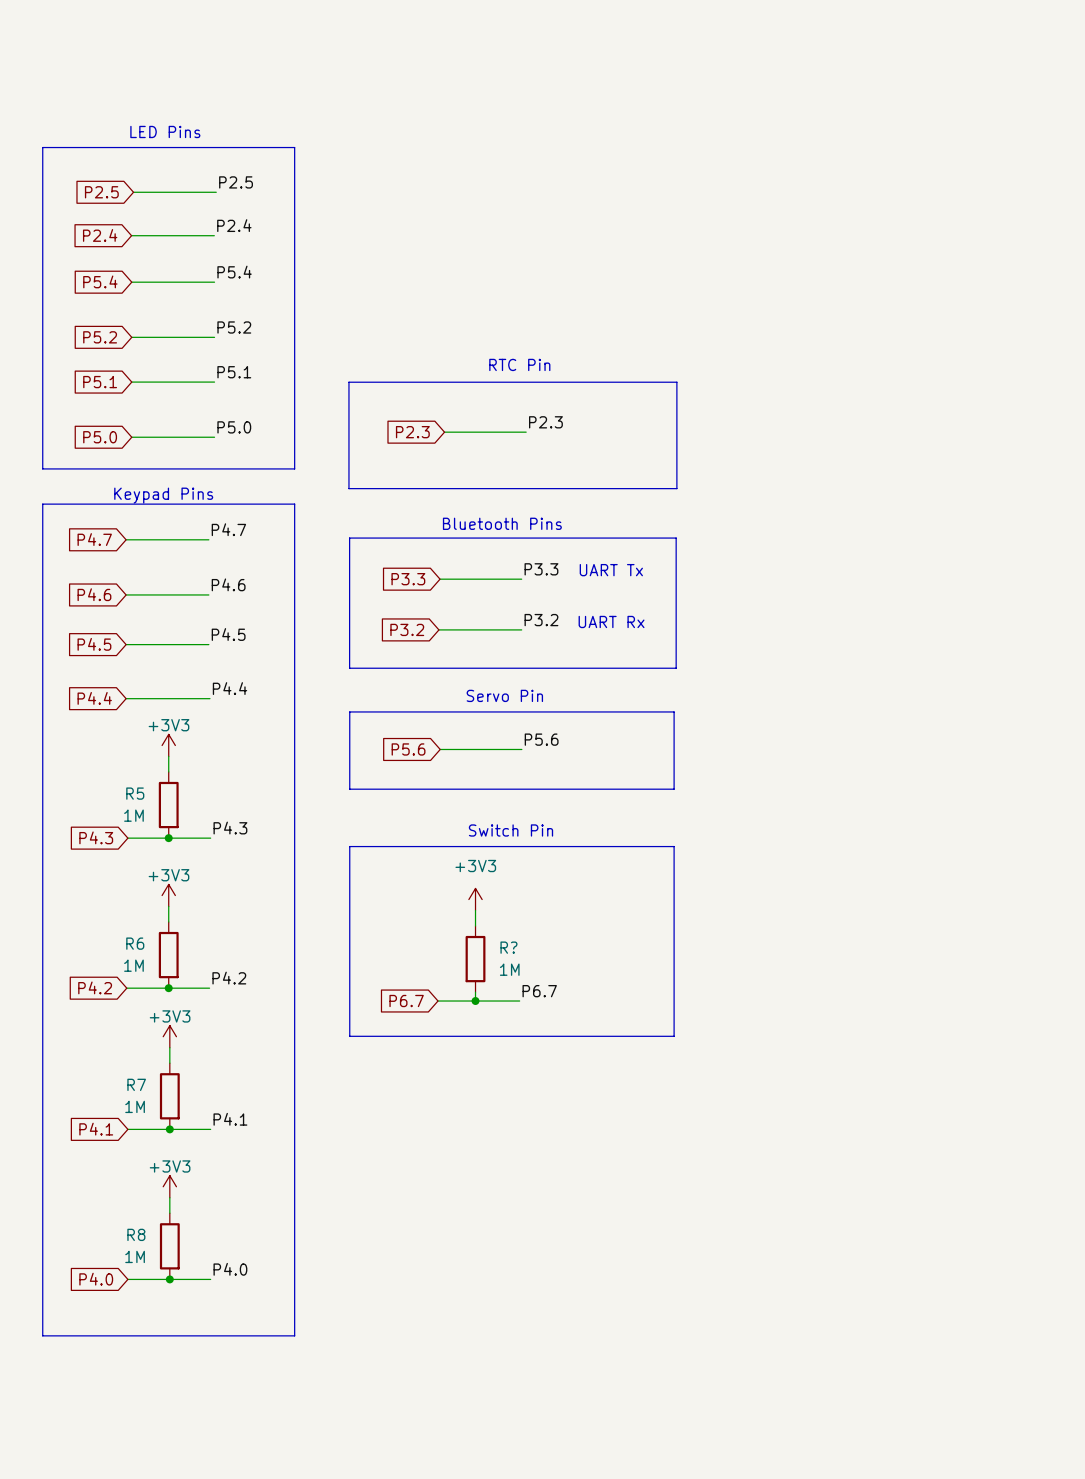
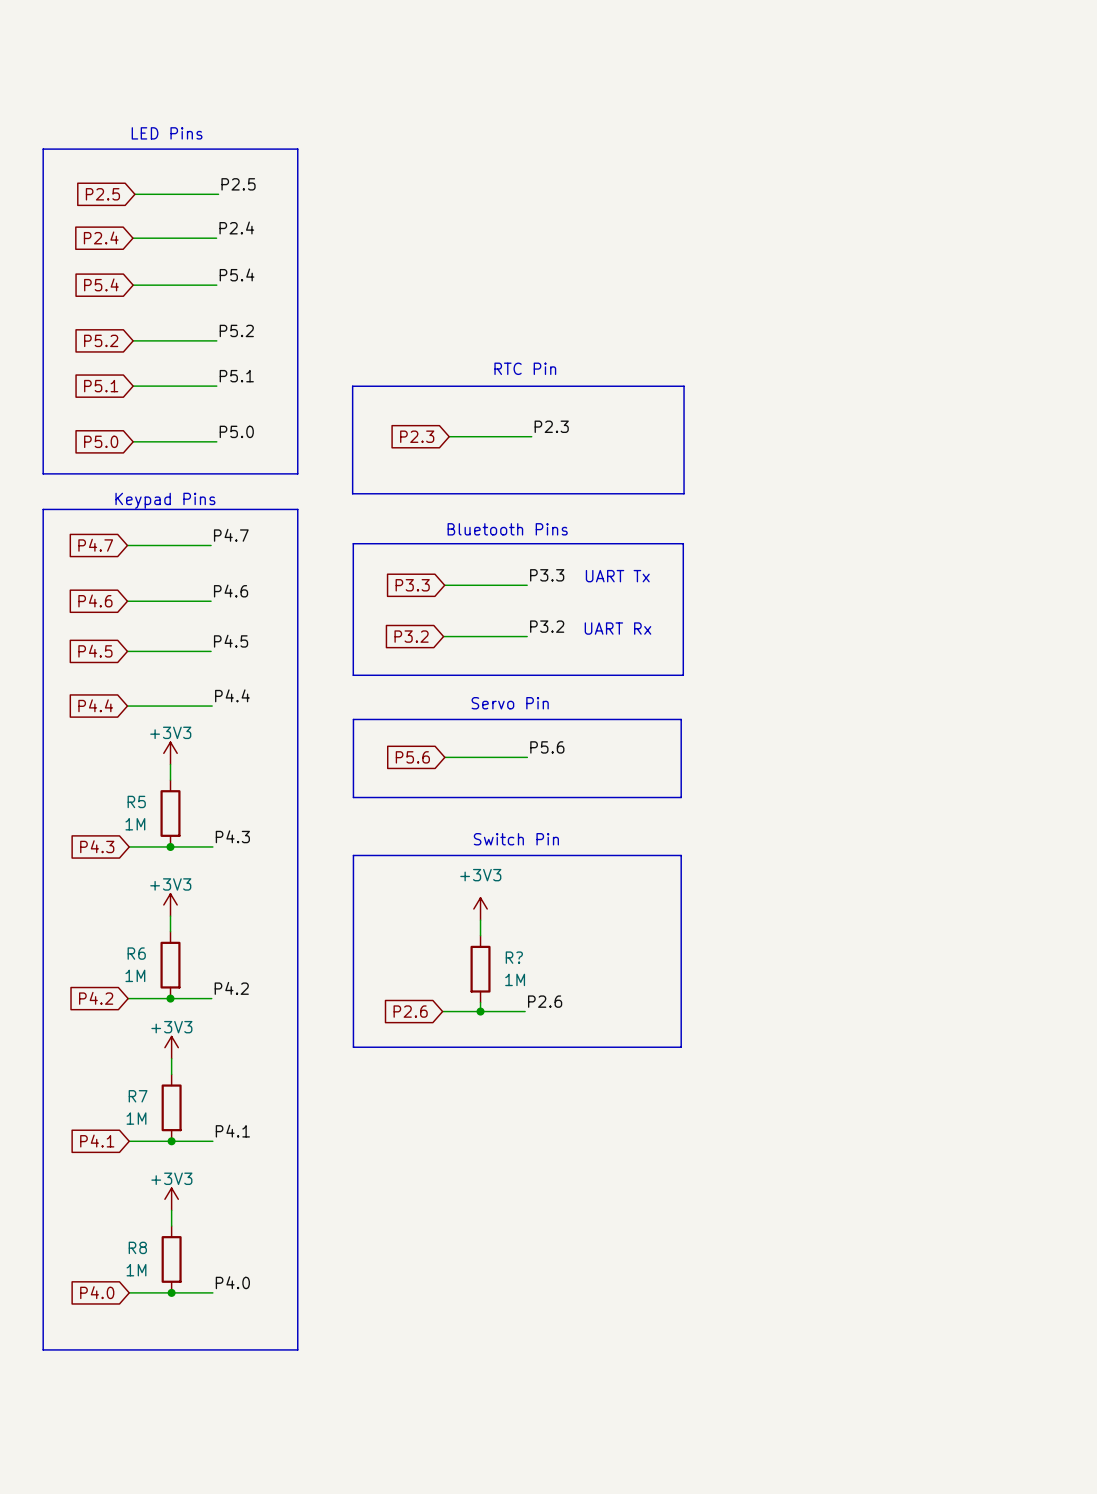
label: P6.7 (539, 991) -> P2.6 (545, 1001)
global label: P6.7 (406, 1001) -> P2.6 (410, 1011)

